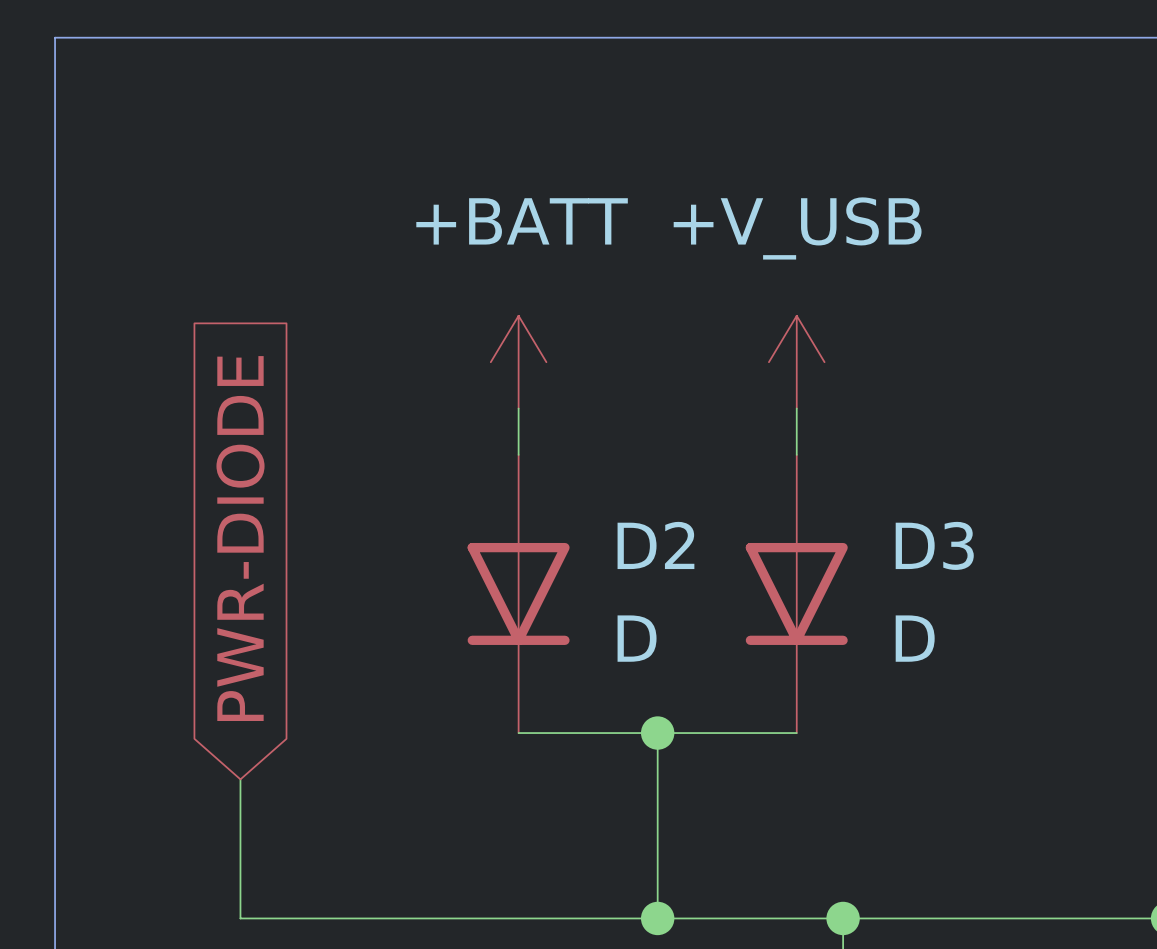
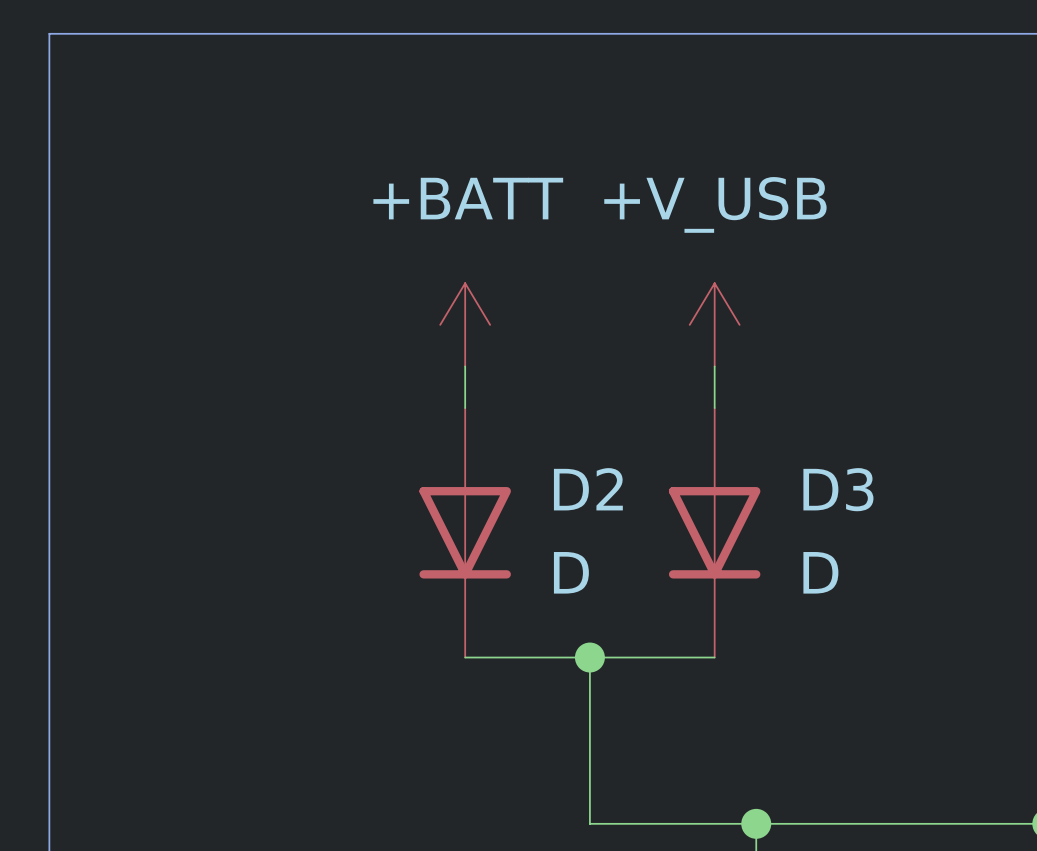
global label: PWR-DIODE (240, 538) -> none
wire: (240, 779) (240, 918) (657, 918) -> none
junction: (657, 918) -> none

